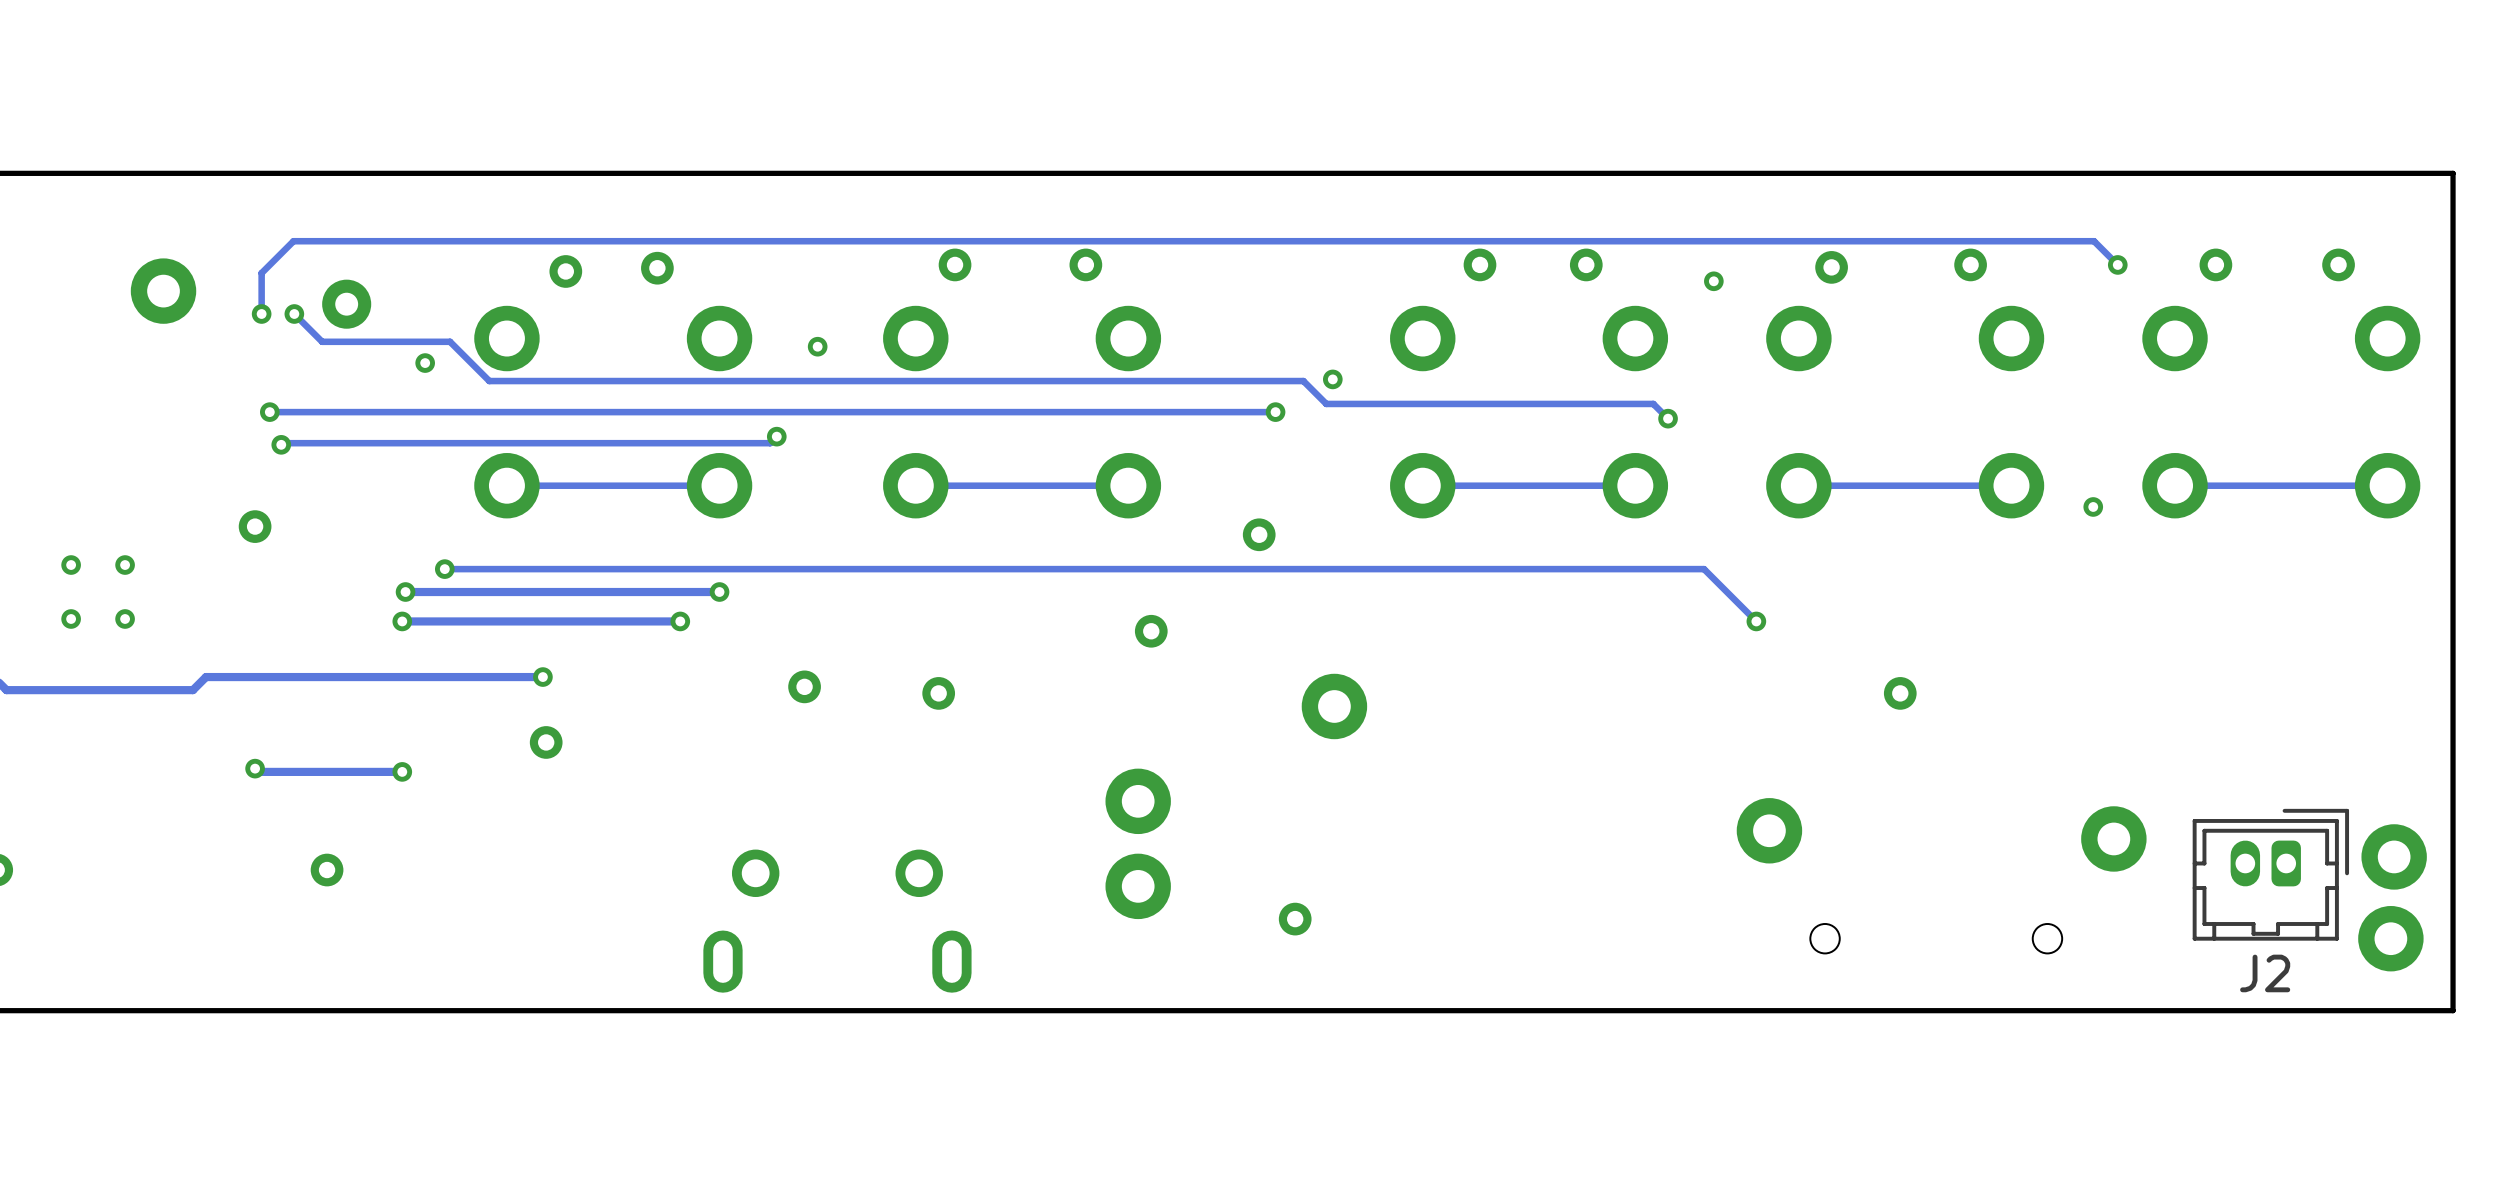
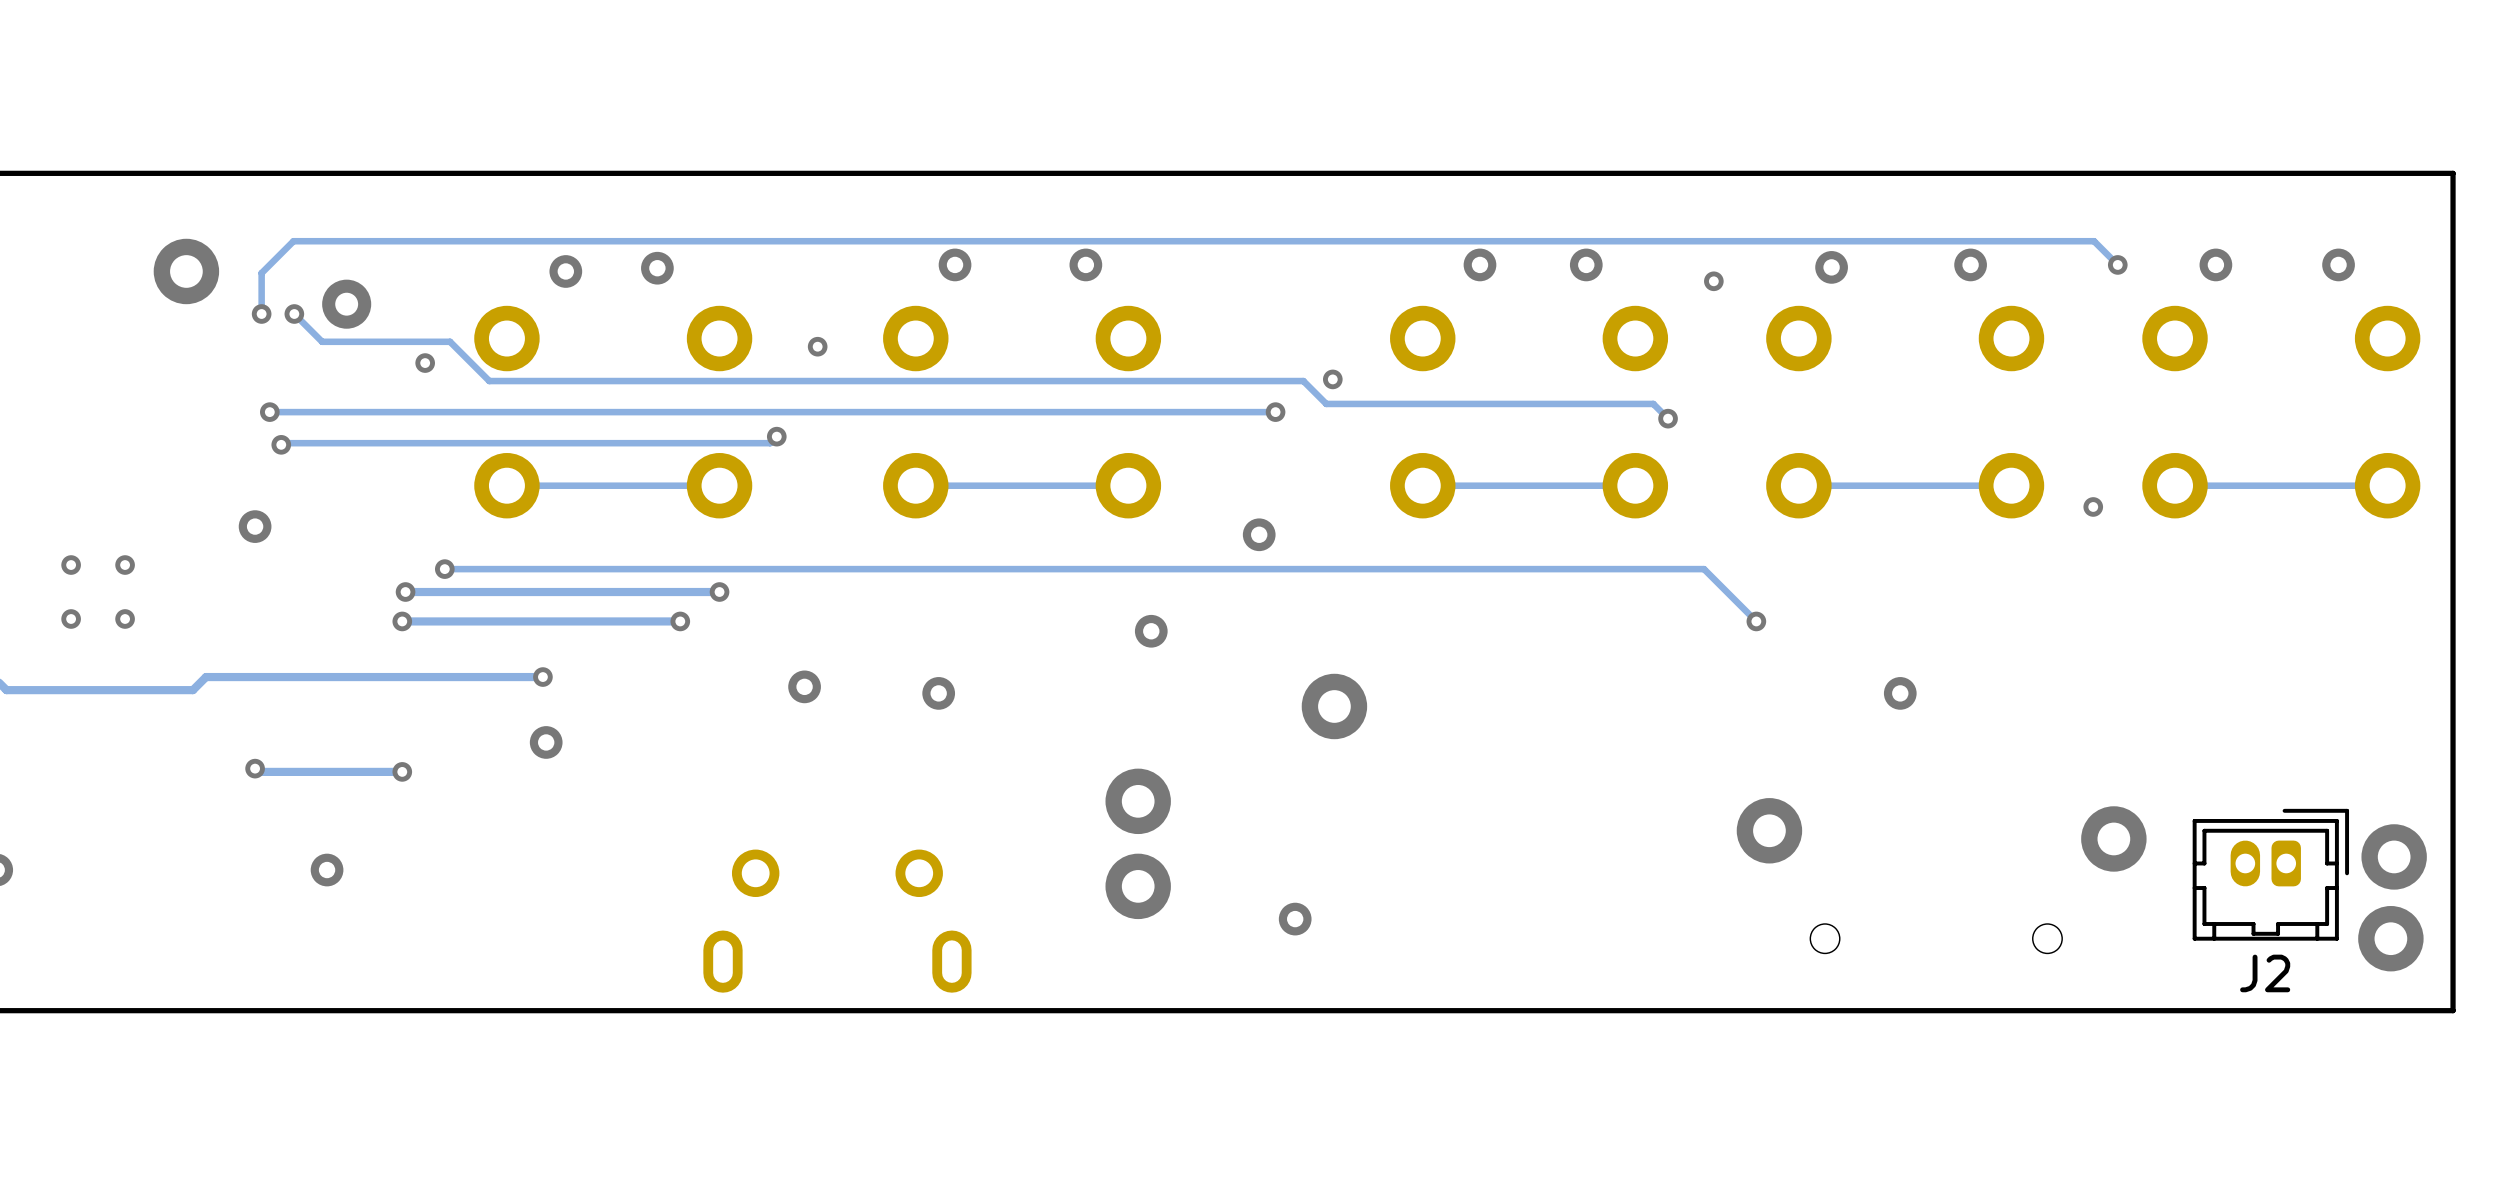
via position: (163, 291) -> (186, 271)

